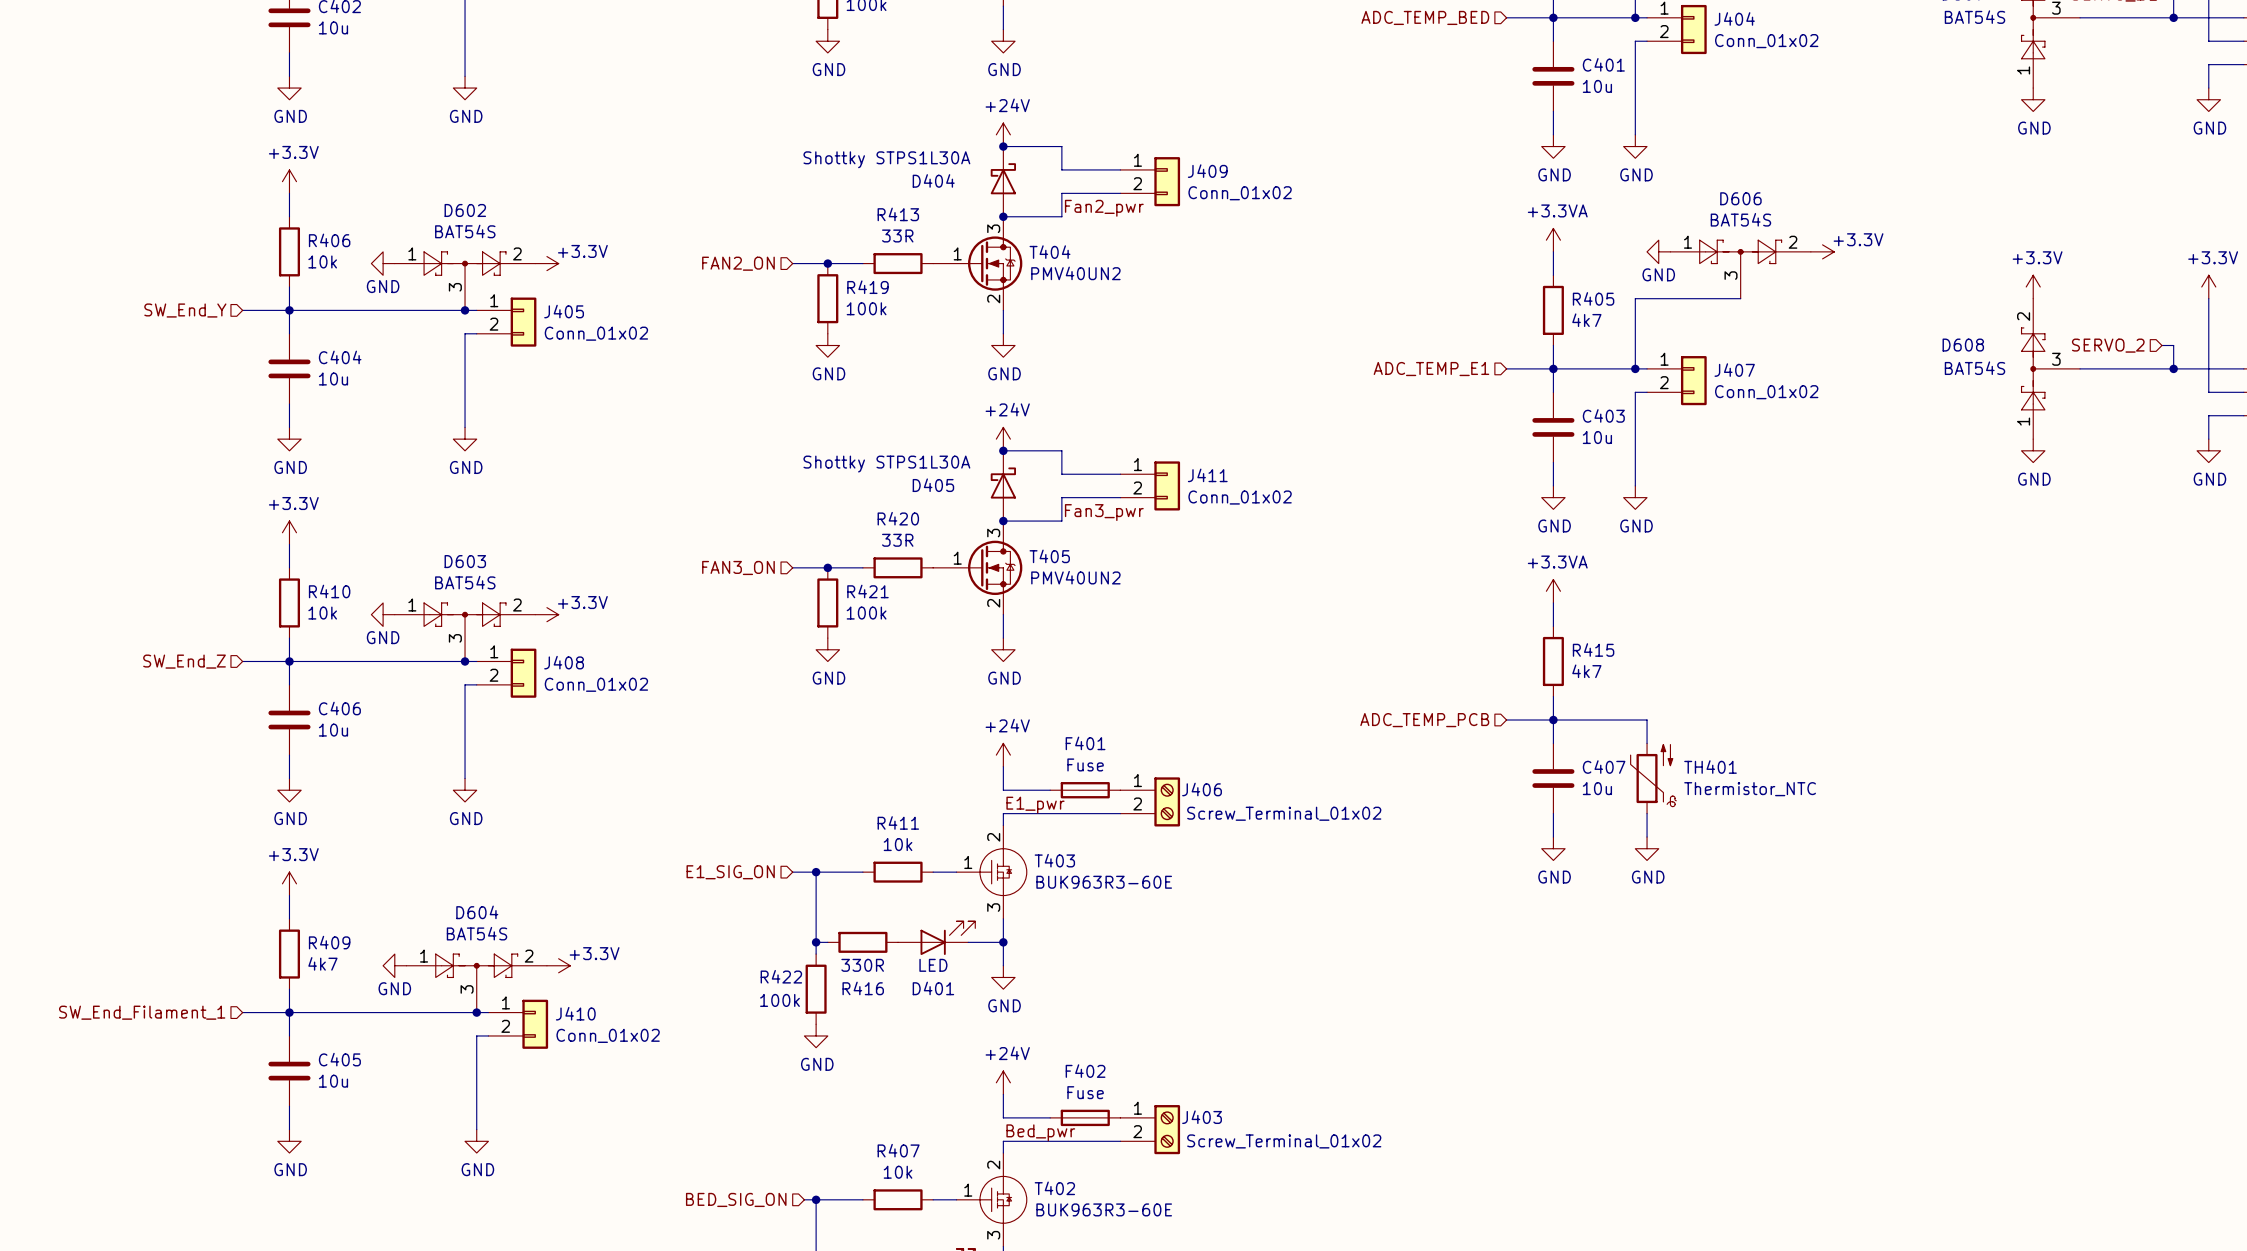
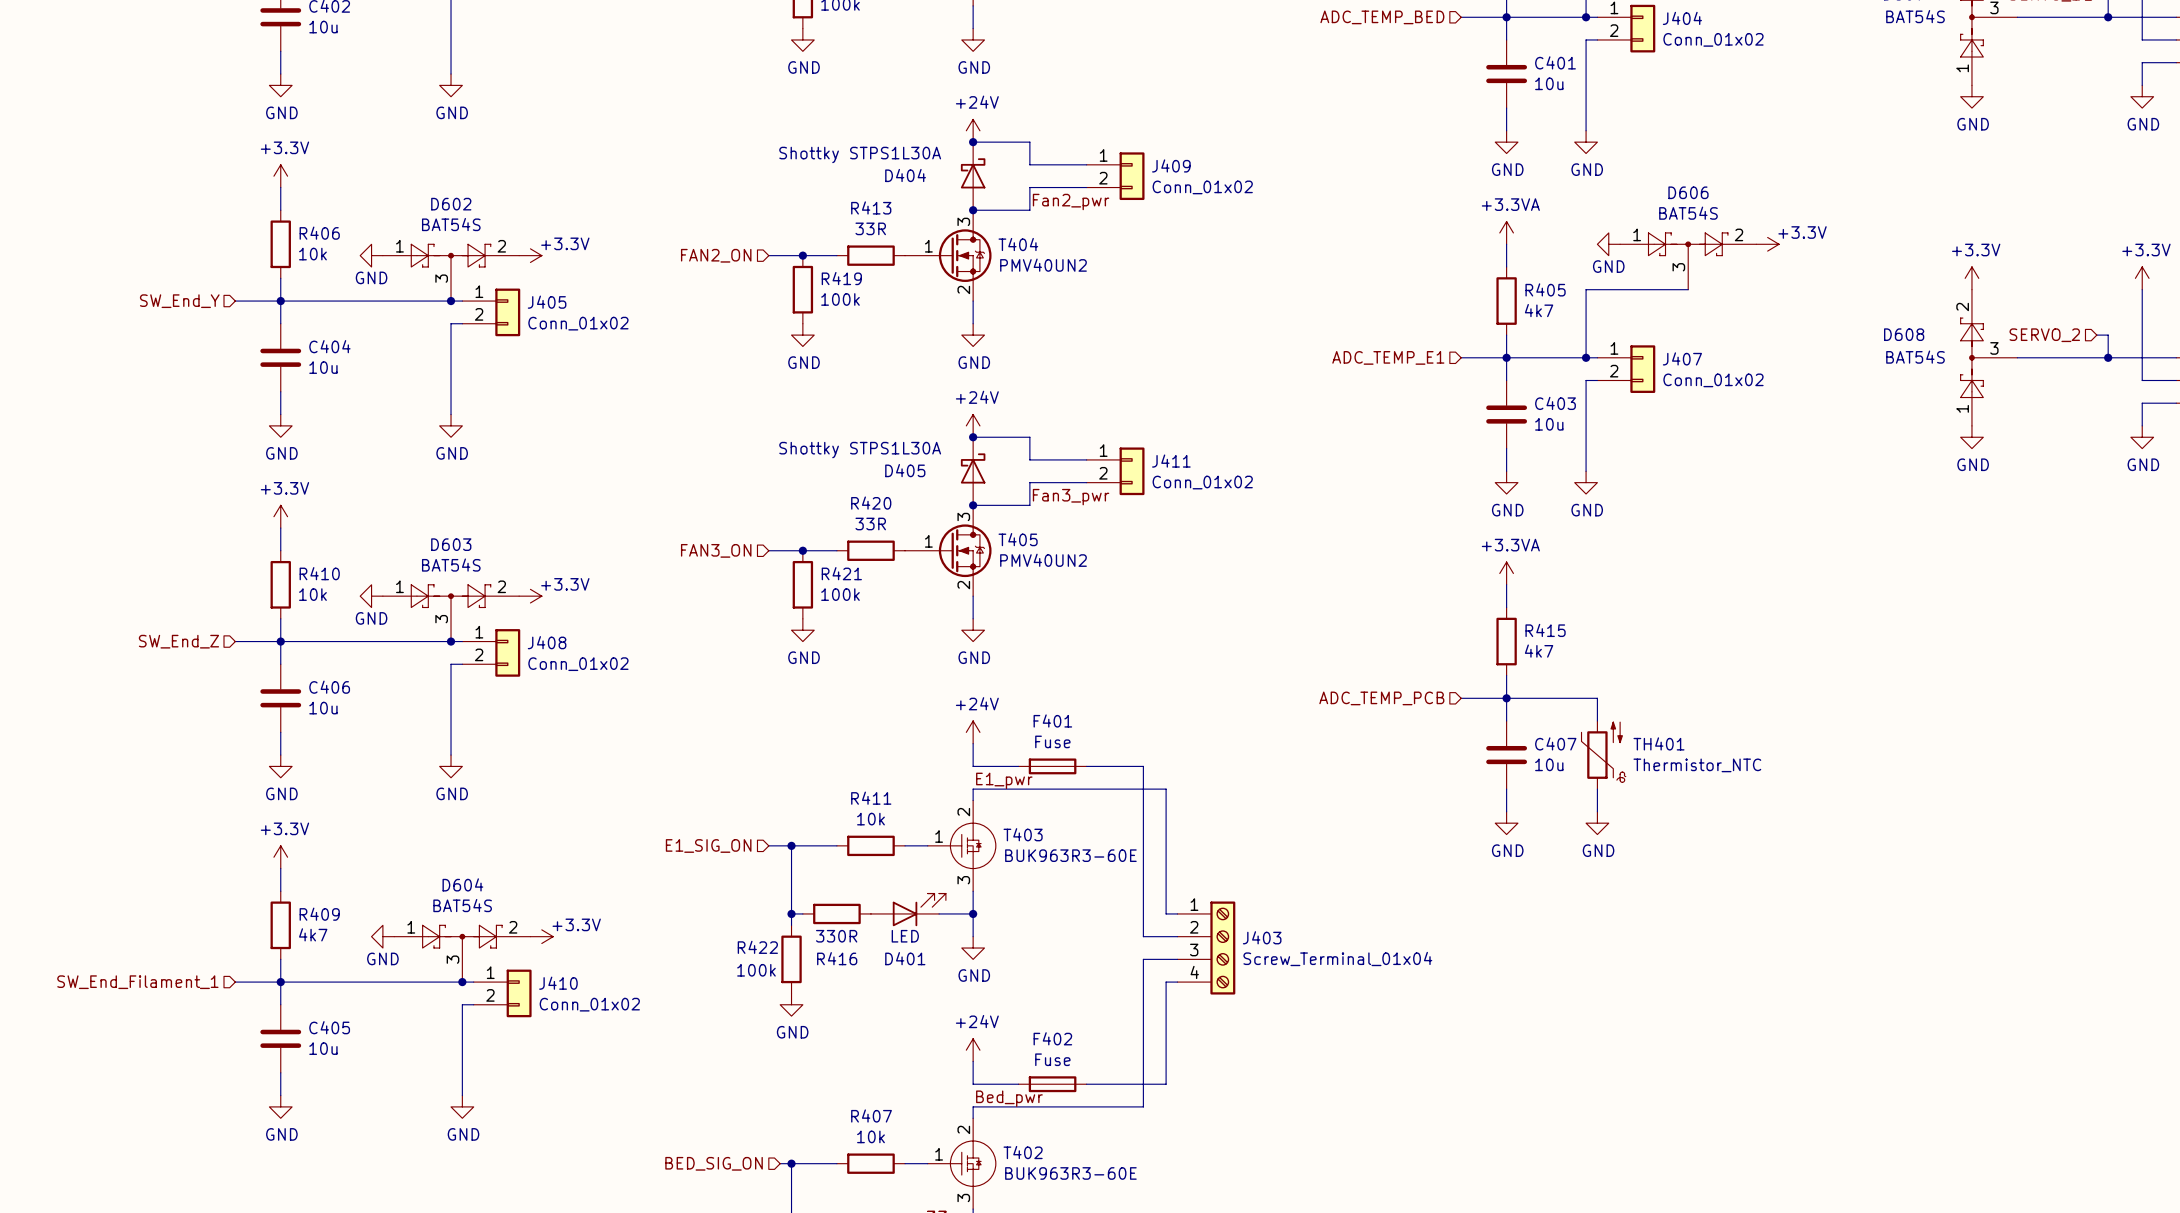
wire: none -> (1086, 766) (1143, 766) (1143, 936) (1177, 936)
J406: Screw_Terminal_01x02 (1150, 801) -> none
wire: none -> (1086, 789) (1166, 789) (1166, 913) (1177, 913)
wire: none -> (1177, 959) (1143, 959) (1143, 1106) (1086, 1106)
wire: none -> (1177, 982) (1166, 982) (1166, 1084) (1086, 1084)
J403 symbol: [1120, 1105, 1181, 1155] -> [1177, 901, 1236, 995]
J403 value: Screw_Terminal_01x02 (1284, 1141) -> Screw_Terminal_01x04 (1337, 958)

